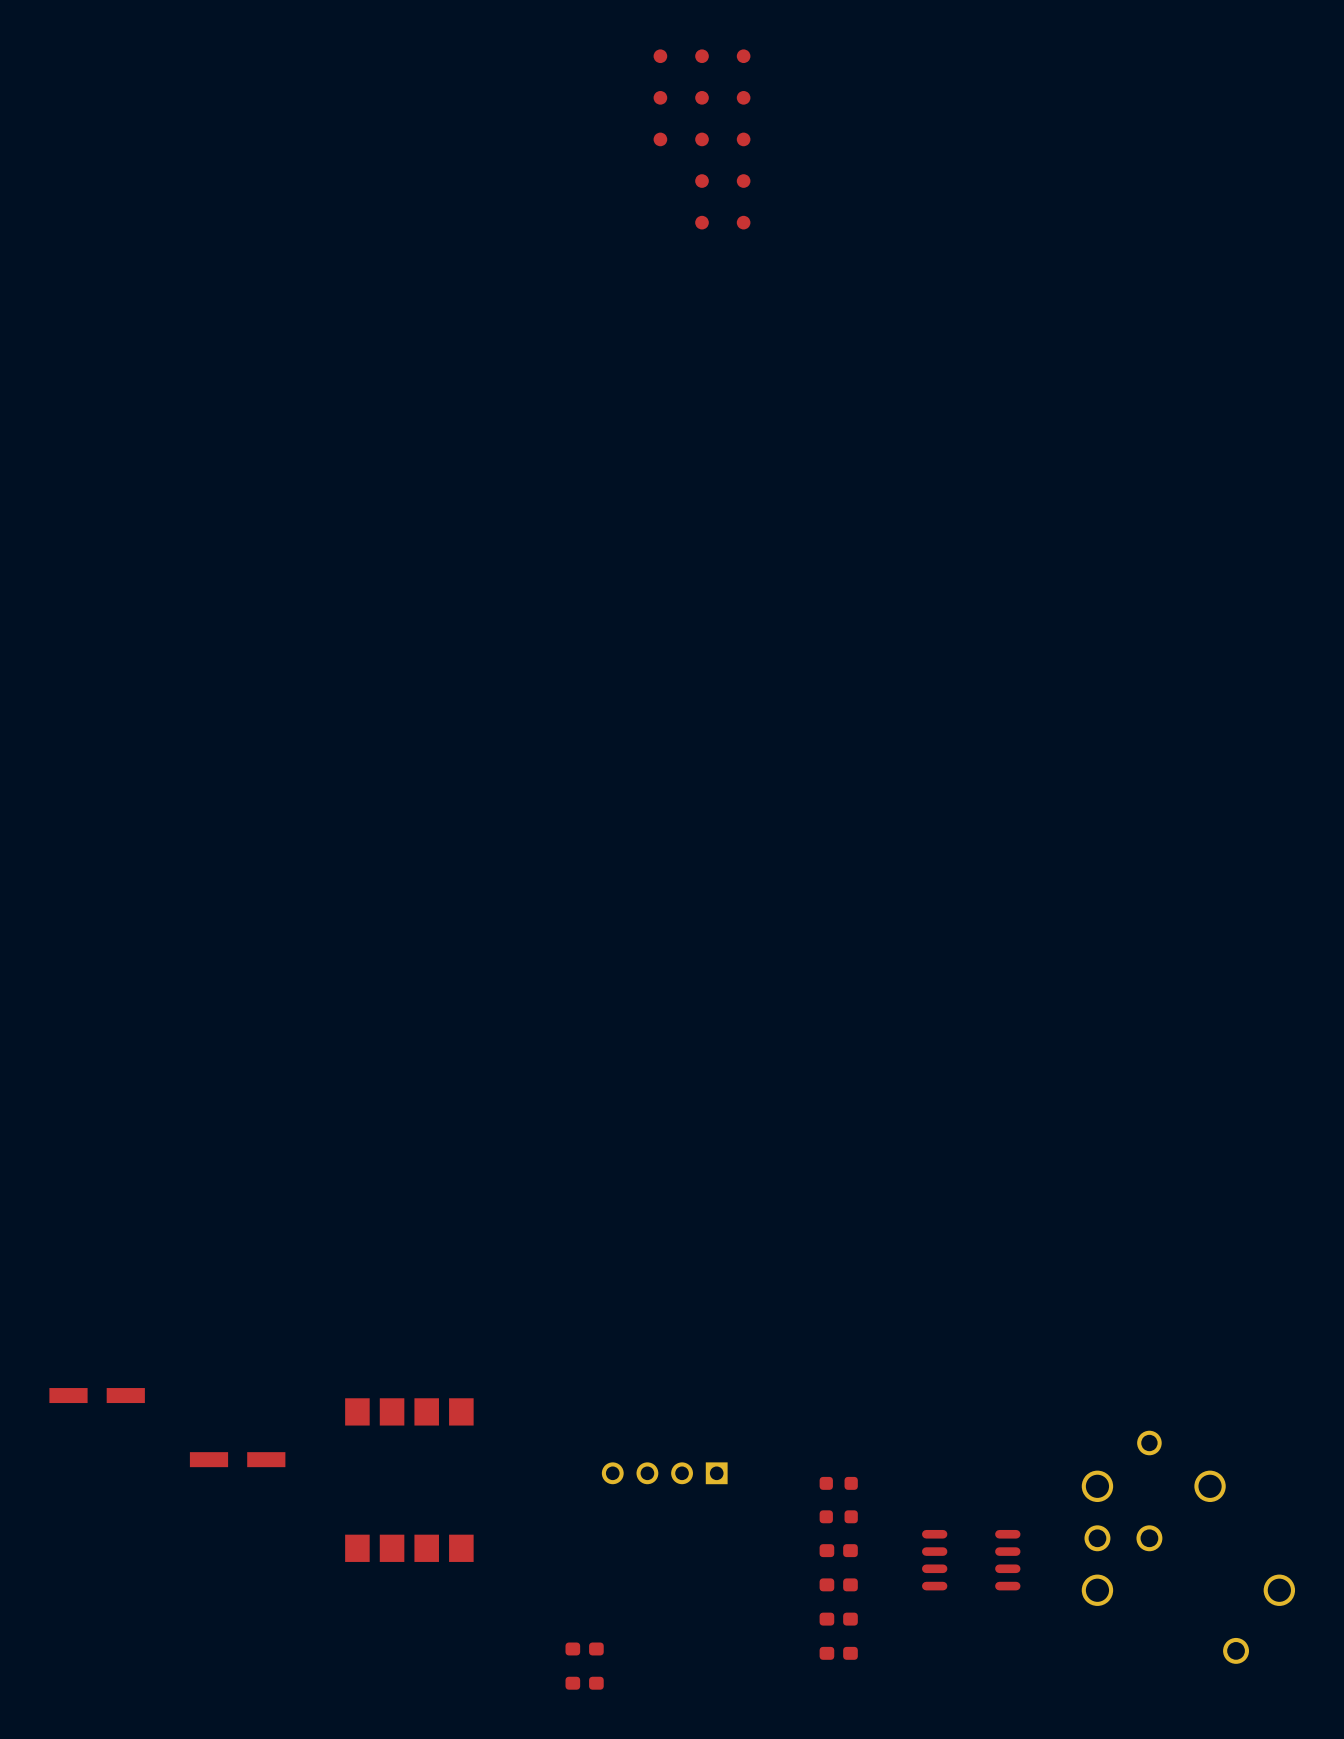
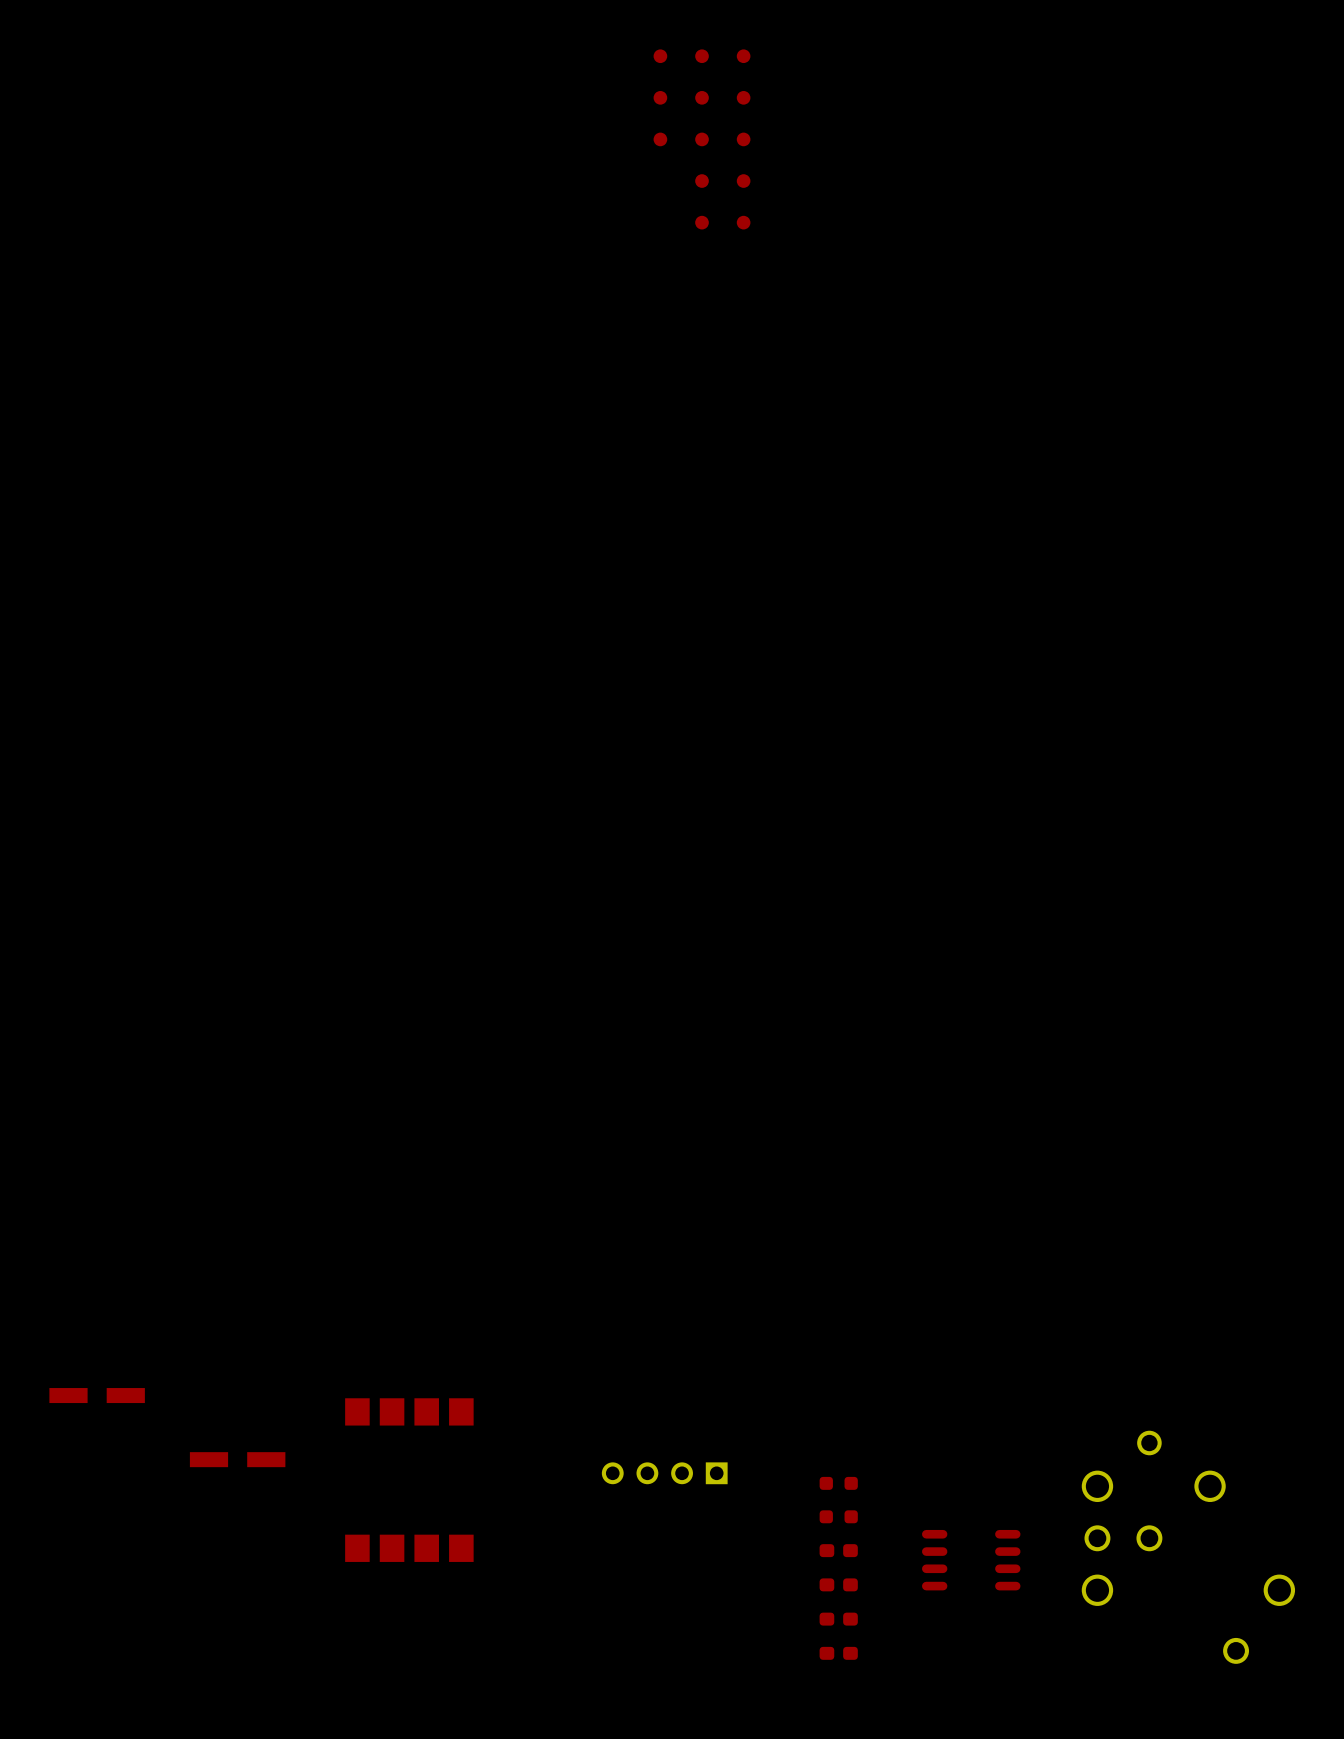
part: (584, 1648) -> none
part: (584, 1683) -> none

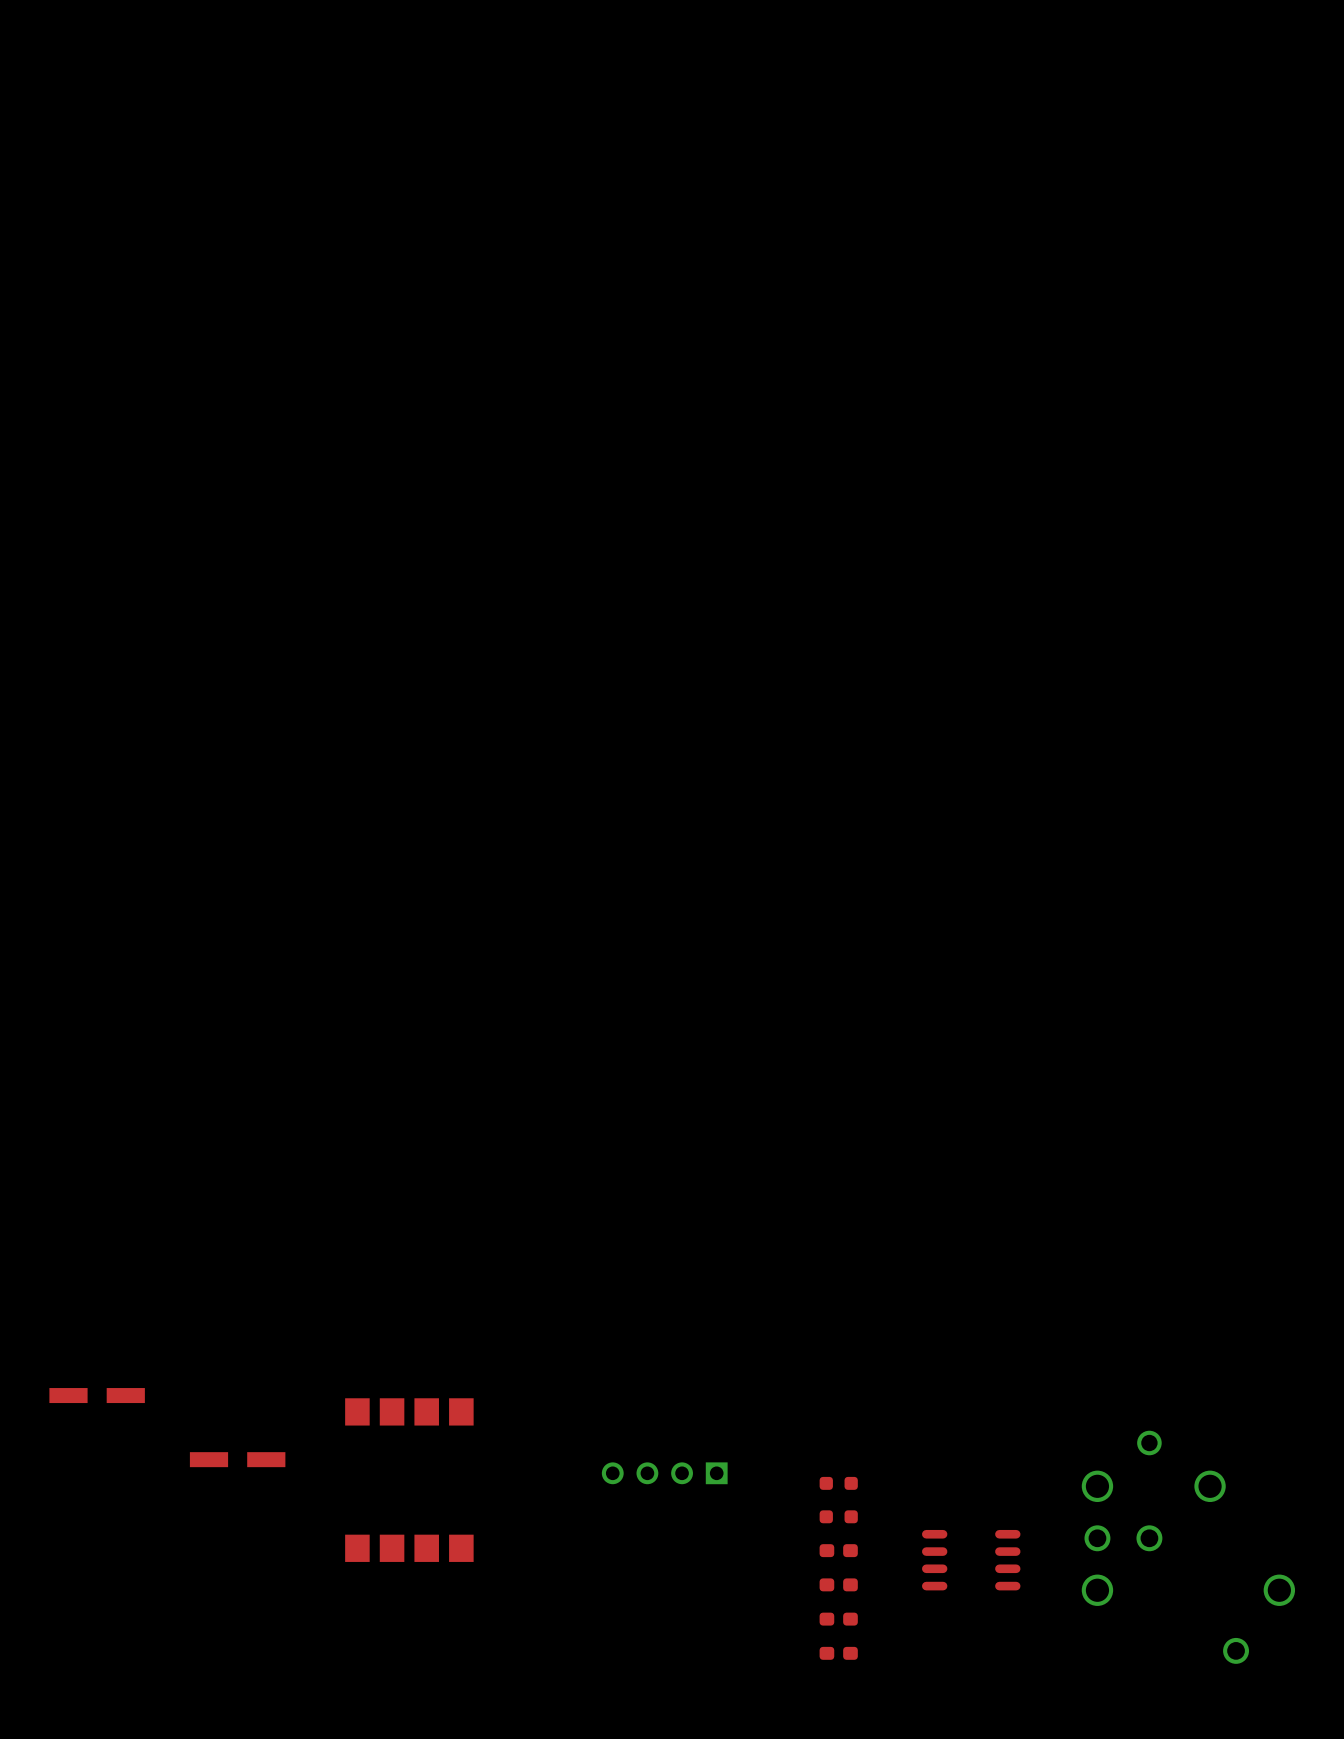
part: (660, 56) -> none
part: (702, 56) -> none
part: (743, 56) -> none
part: (660, 97) -> none
part: (702, 97) -> none
part: (743, 97) -> none
part: (660, 139) -> none
part: (702, 139) -> none
part: (743, 139) -> none
part: (702, 181) -> none
part: (743, 181) -> none
part: (702, 222) -> none
part: (743, 222) -> none

